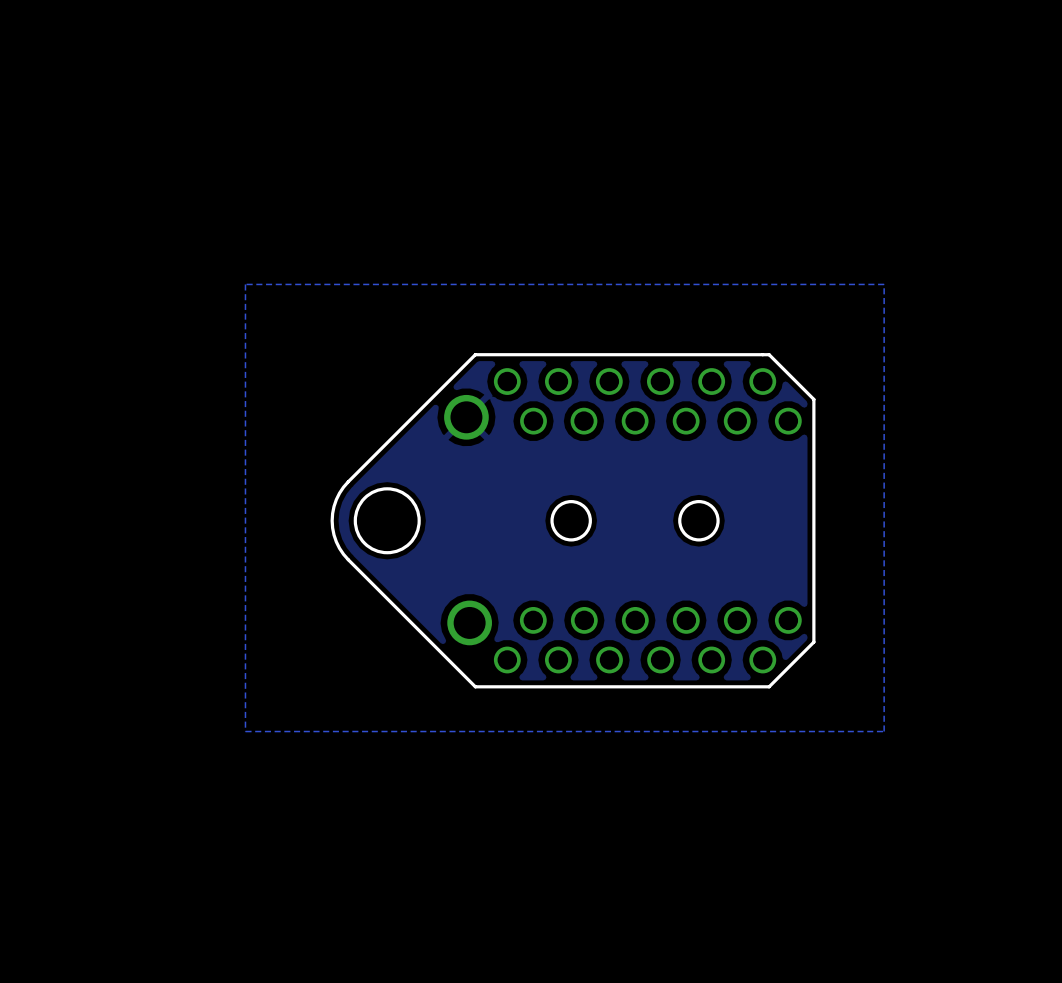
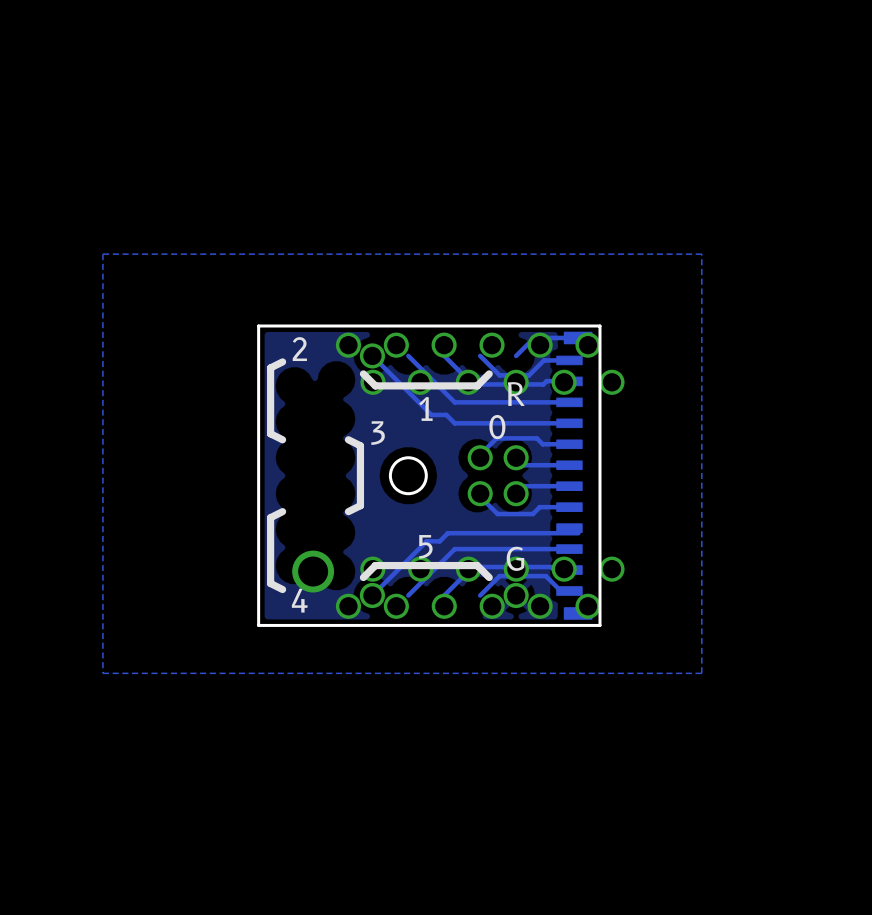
board edge: (769, 354) (813, 399) (813, 642) (769, 686) (475, 686) (348, 559) (336, 541) (332, 527) (332, 513) (336, 499) (343, 487) (475, 354) (769, 354) -> (600, 326) (600, 625) (258, 625) (258, 326) (600, 326)
track: none -> (578, 337) (534, 337) (516, 355)
text: none -> 2 (299, 349)
track: none -> (372, 355) (431, 414) (446, 414) (454, 423) (569, 423)
part: none -> (372, 355)
track: none -> (408, 355) (454, 402) (569, 402)
track: none -> (444, 355) (472, 384) (543, 384) (546, 381) (569, 381)
track: none -> (480, 355) (499, 375) (529, 375) (544, 360) (569, 360)
line: none -> (282, 361) (270, 367) (270, 433) (282, 439)
line: none -> (489, 373) (477, 385) (375, 385) (363, 373)
part: (466, 417) -> none
text: none -> R (516, 394)
text: none -> 1 (425, 408)
text: none -> 0 (497, 427)
text: none -> 3 (378, 433)
line: none -> (348, 439) (360, 445) (360, 505) (348, 511)
round board edge: [353, 487, 421, 555] -> none
track: none -> (569, 444) (542, 444) (536, 438) (496, 438) (477, 457)
round board edge: [678, 500, 720, 542] -> none
part: none -> (480, 457)
track: none -> (513, 457) (520, 465) (569, 465)
part: none -> (516, 457)
part: none -> (574, 475)
track: none -> (569, 486) (520, 486) (513, 493)
track: none -> (477, 493) (497, 514) (532, 514) (539, 507) (569, 507)
part: none -> (480, 493)
part: none -> (516, 493)
line: none -> (282, 511) (270, 517) (270, 583) (282, 589)
track: none -> (578, 533) (447, 533) (439, 541) (426, 541) (372, 595)
text: none -> 5 (425, 546)
track: none -> (569, 549) (454, 549) (408, 595)
text: none -> G (515, 558)
track: none -> (569, 570) (554, 570) (551, 567) (472, 567) (444, 595)
line: none -> (489, 577) (477, 565) (375, 565) (363, 577)
track: none -> (569, 591) (560, 591) (545, 576) (499, 576) (480, 595)
part: none -> (372, 595)
part: none -> (516, 595)
text: none -> 4 (299, 600)

